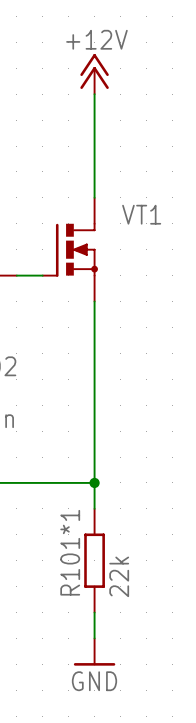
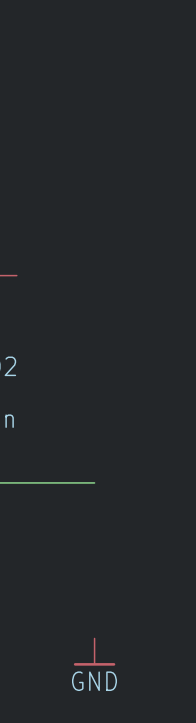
power symbol: +12V (94, 74) -> none
wire: (94, 94) (94, 197) -> none
VT1: (69, 249) -> none
wire: (16, 275) (42, 275) -> none
wire: (94, 301) (94, 508) -> none
junction: (94, 482) -> none
R101*1: 22k (94, 560) -> none
wire: (94, 612) (94, 638) -> none

